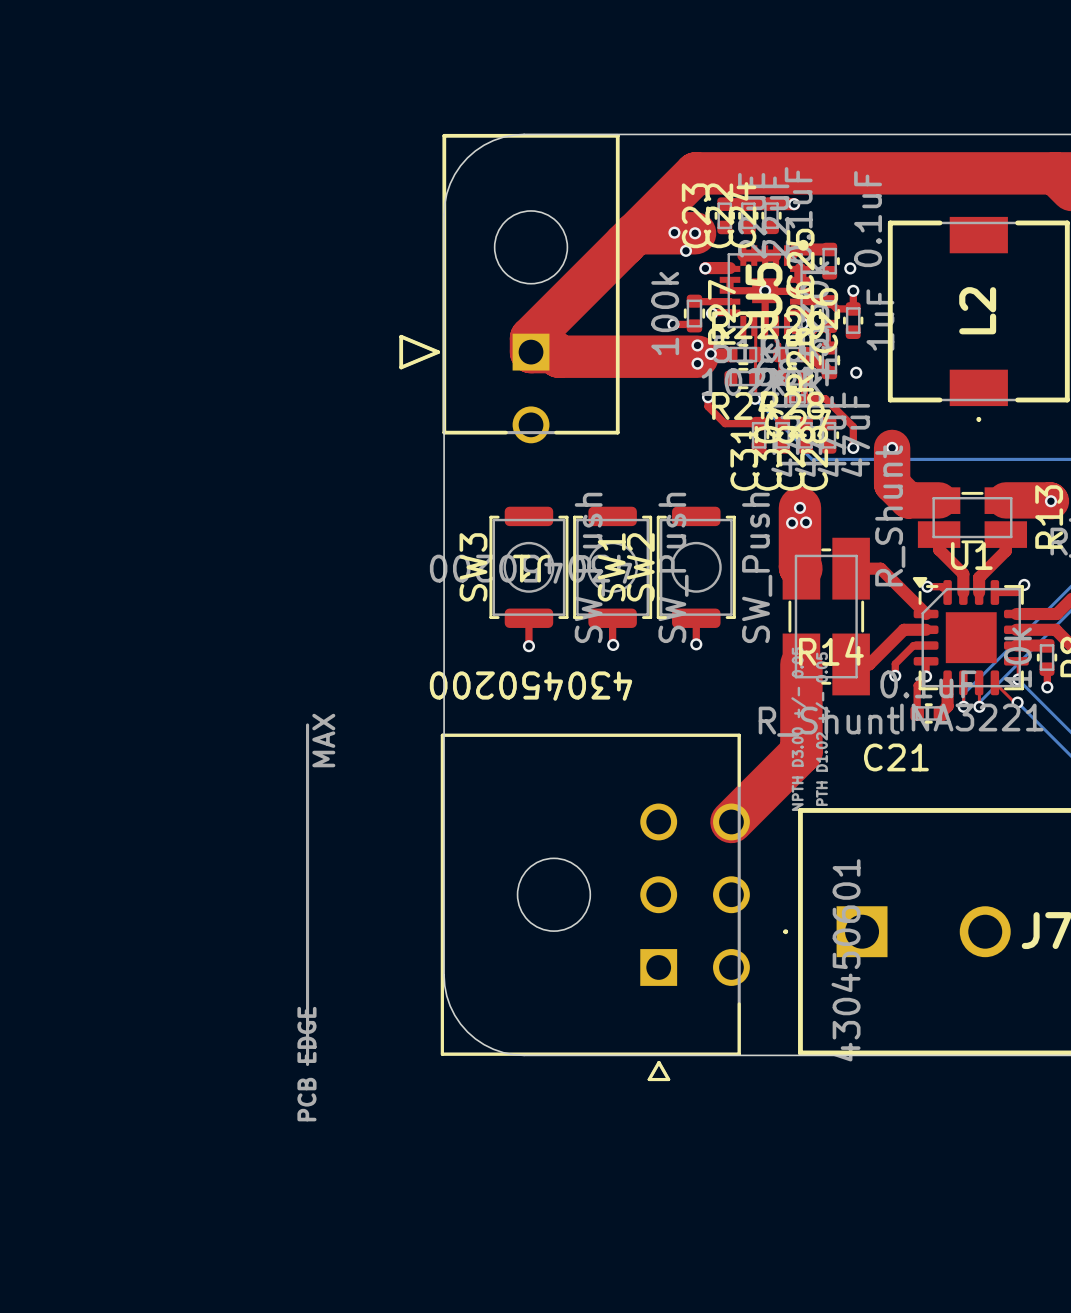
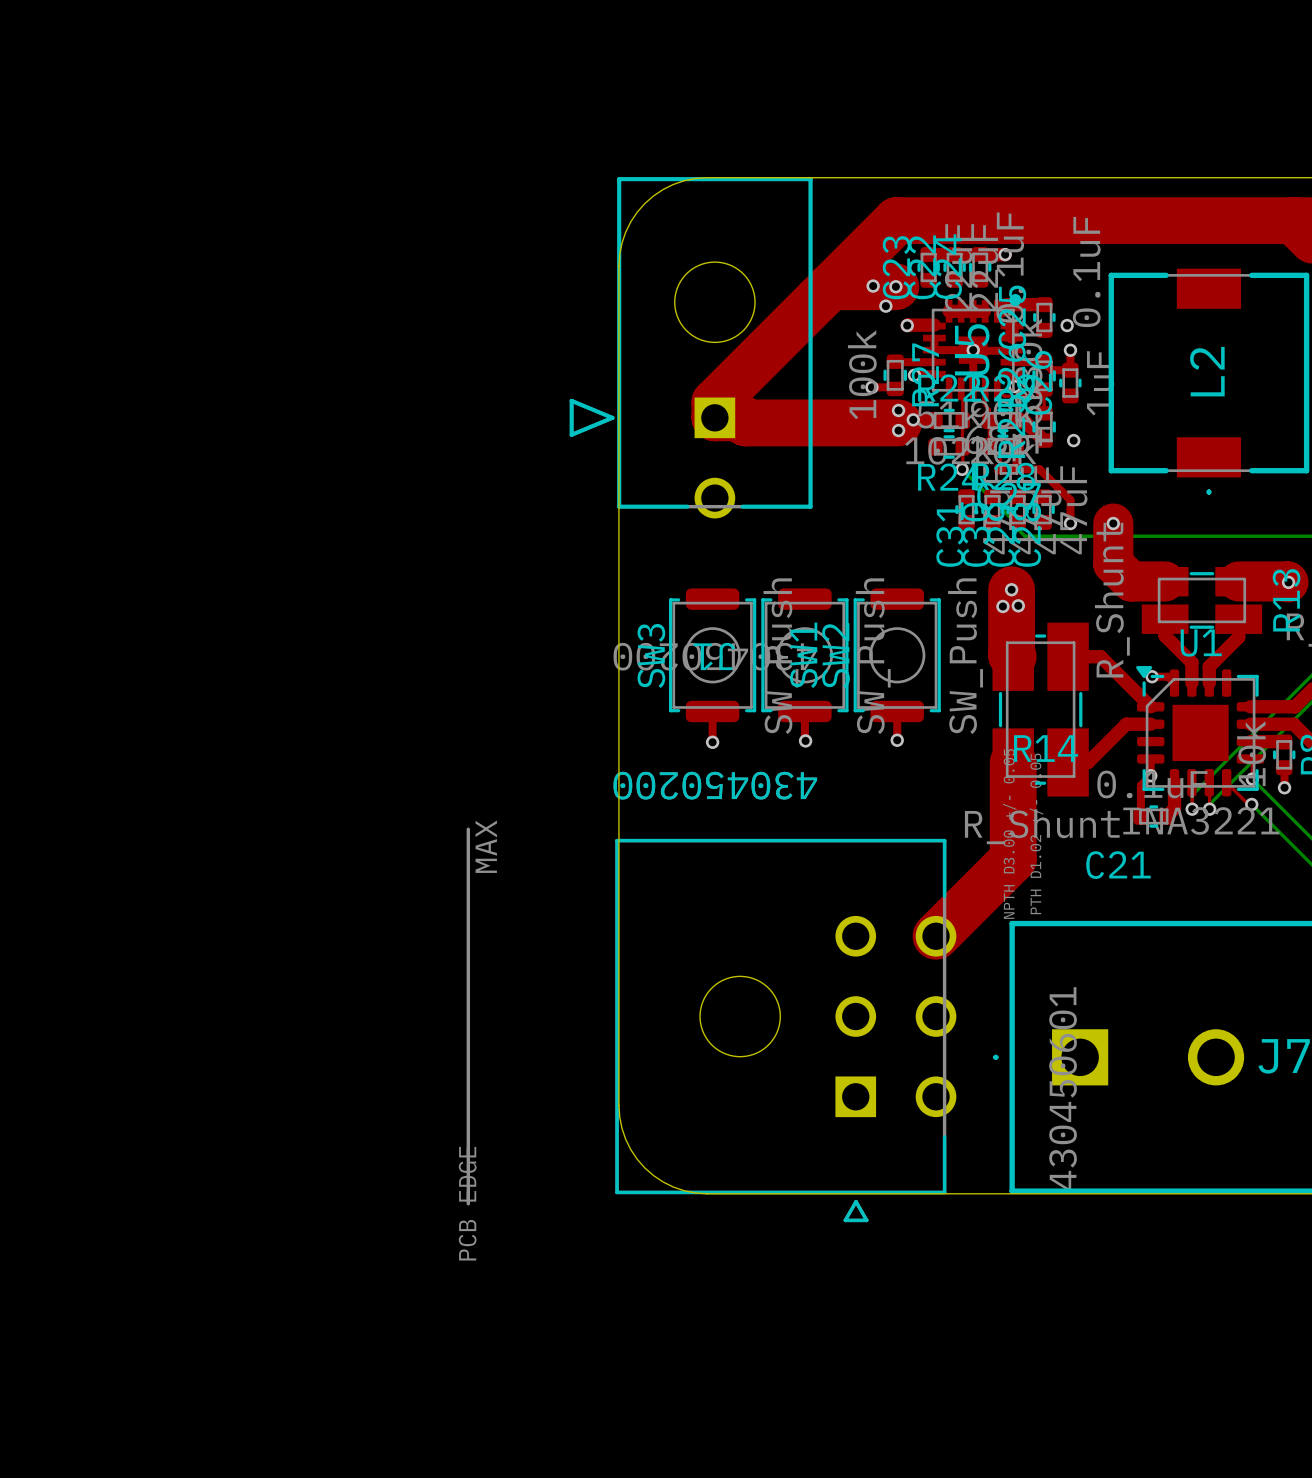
top track: (708, 397) (708, 406) (725, 423) (759, 423) -> none
via: (708, 397) -> none
top track: (1024, 584) (1016, 592) (994, 592) -> none
via: (1024, 584) -> none
top track: (926, 645) (913, 645) (895, 663) (895, 675) -> none
via: (895, 675) -> none

